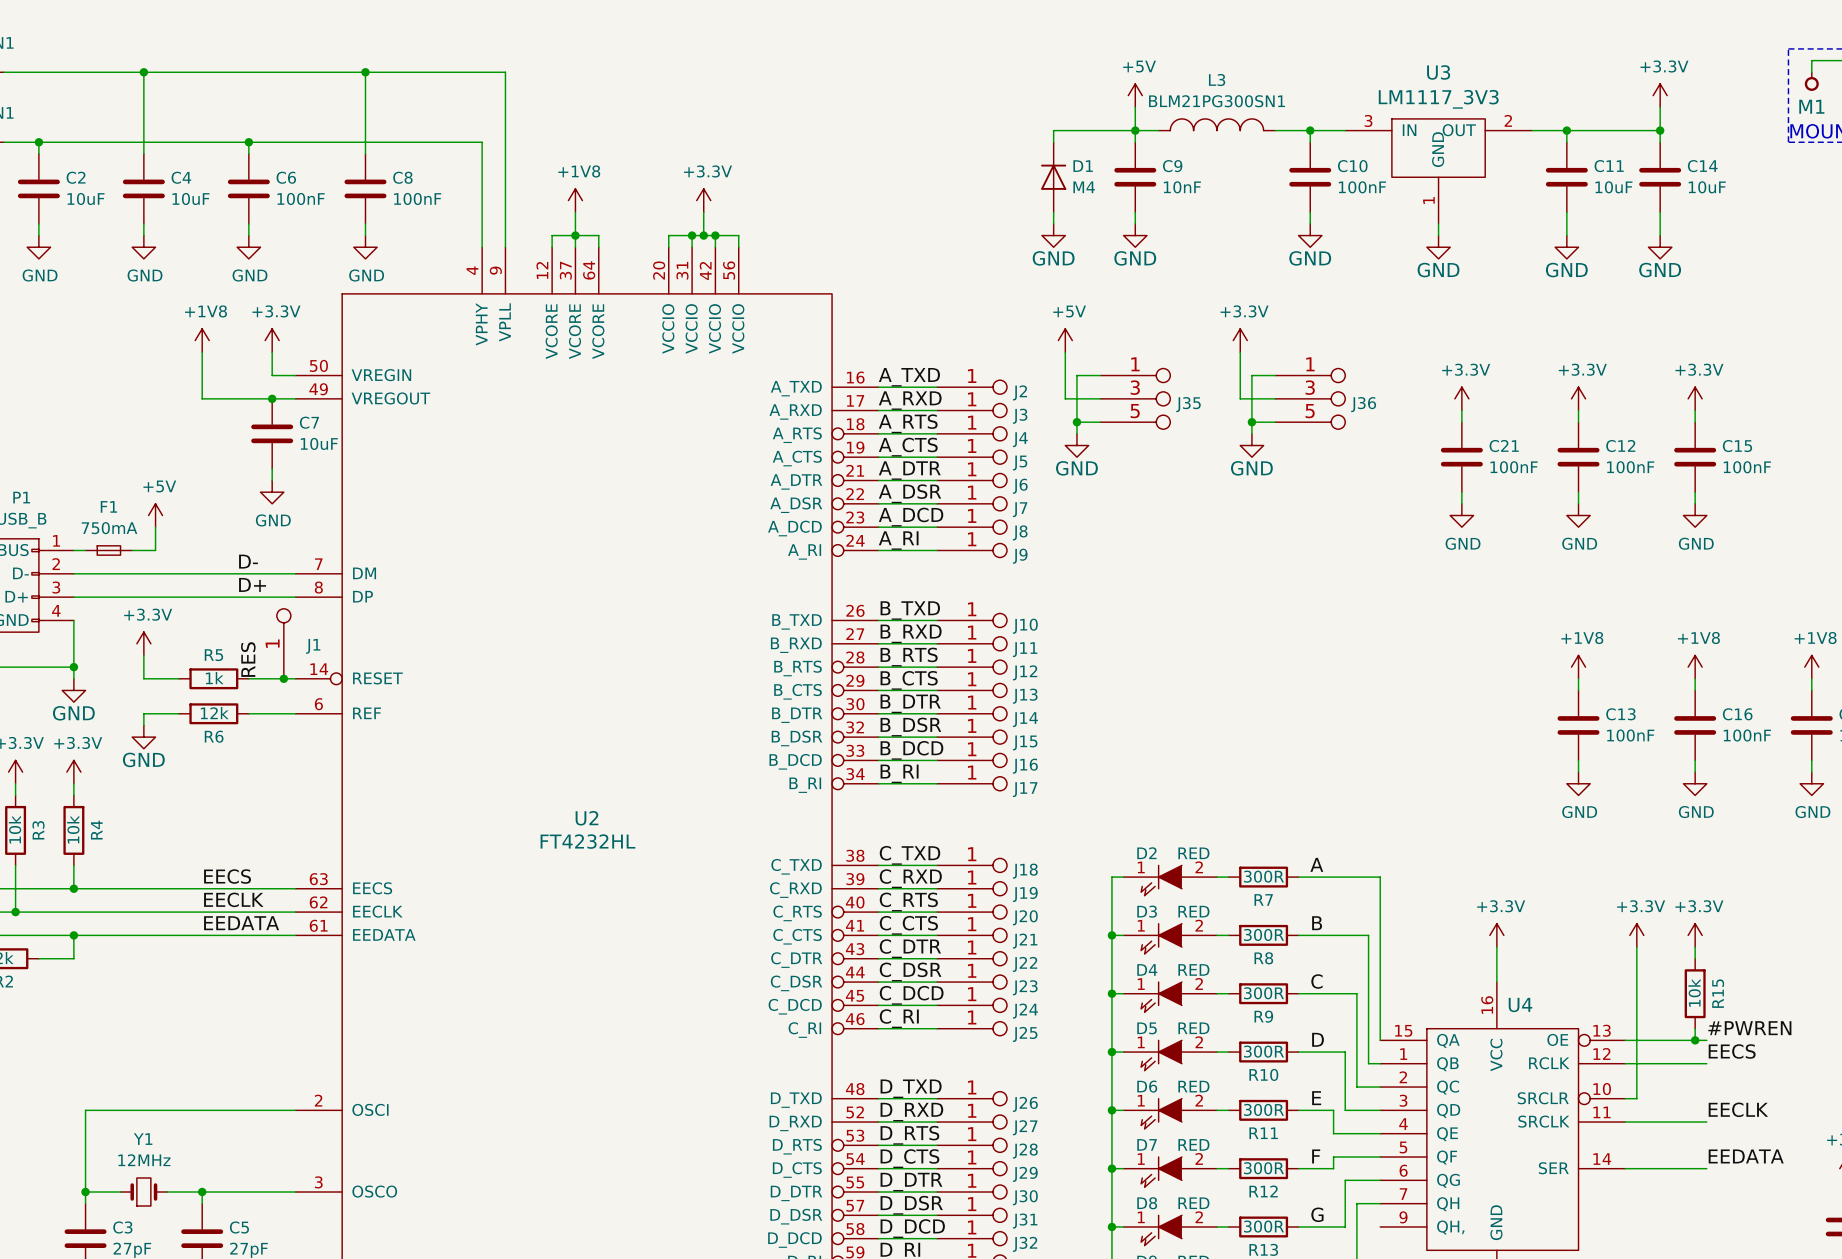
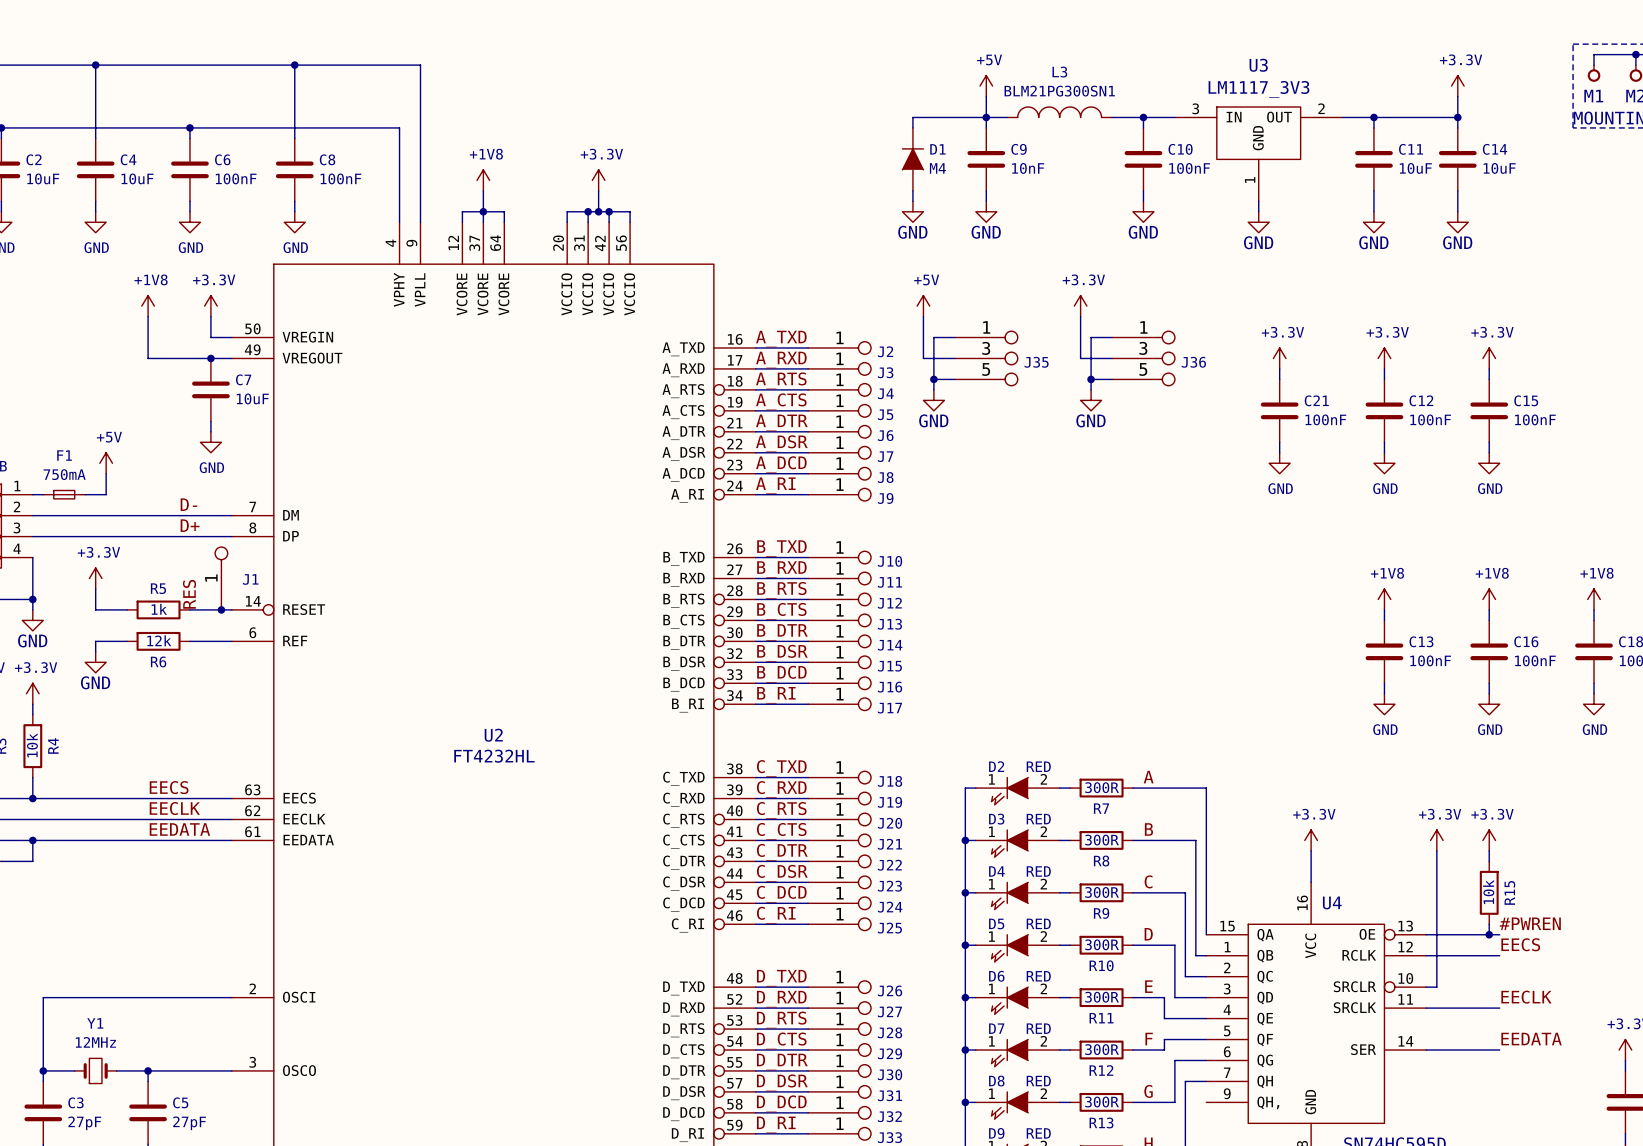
D1 symbol: [1041, 142, 1067, 213] -> [901, 127, 925, 191]

